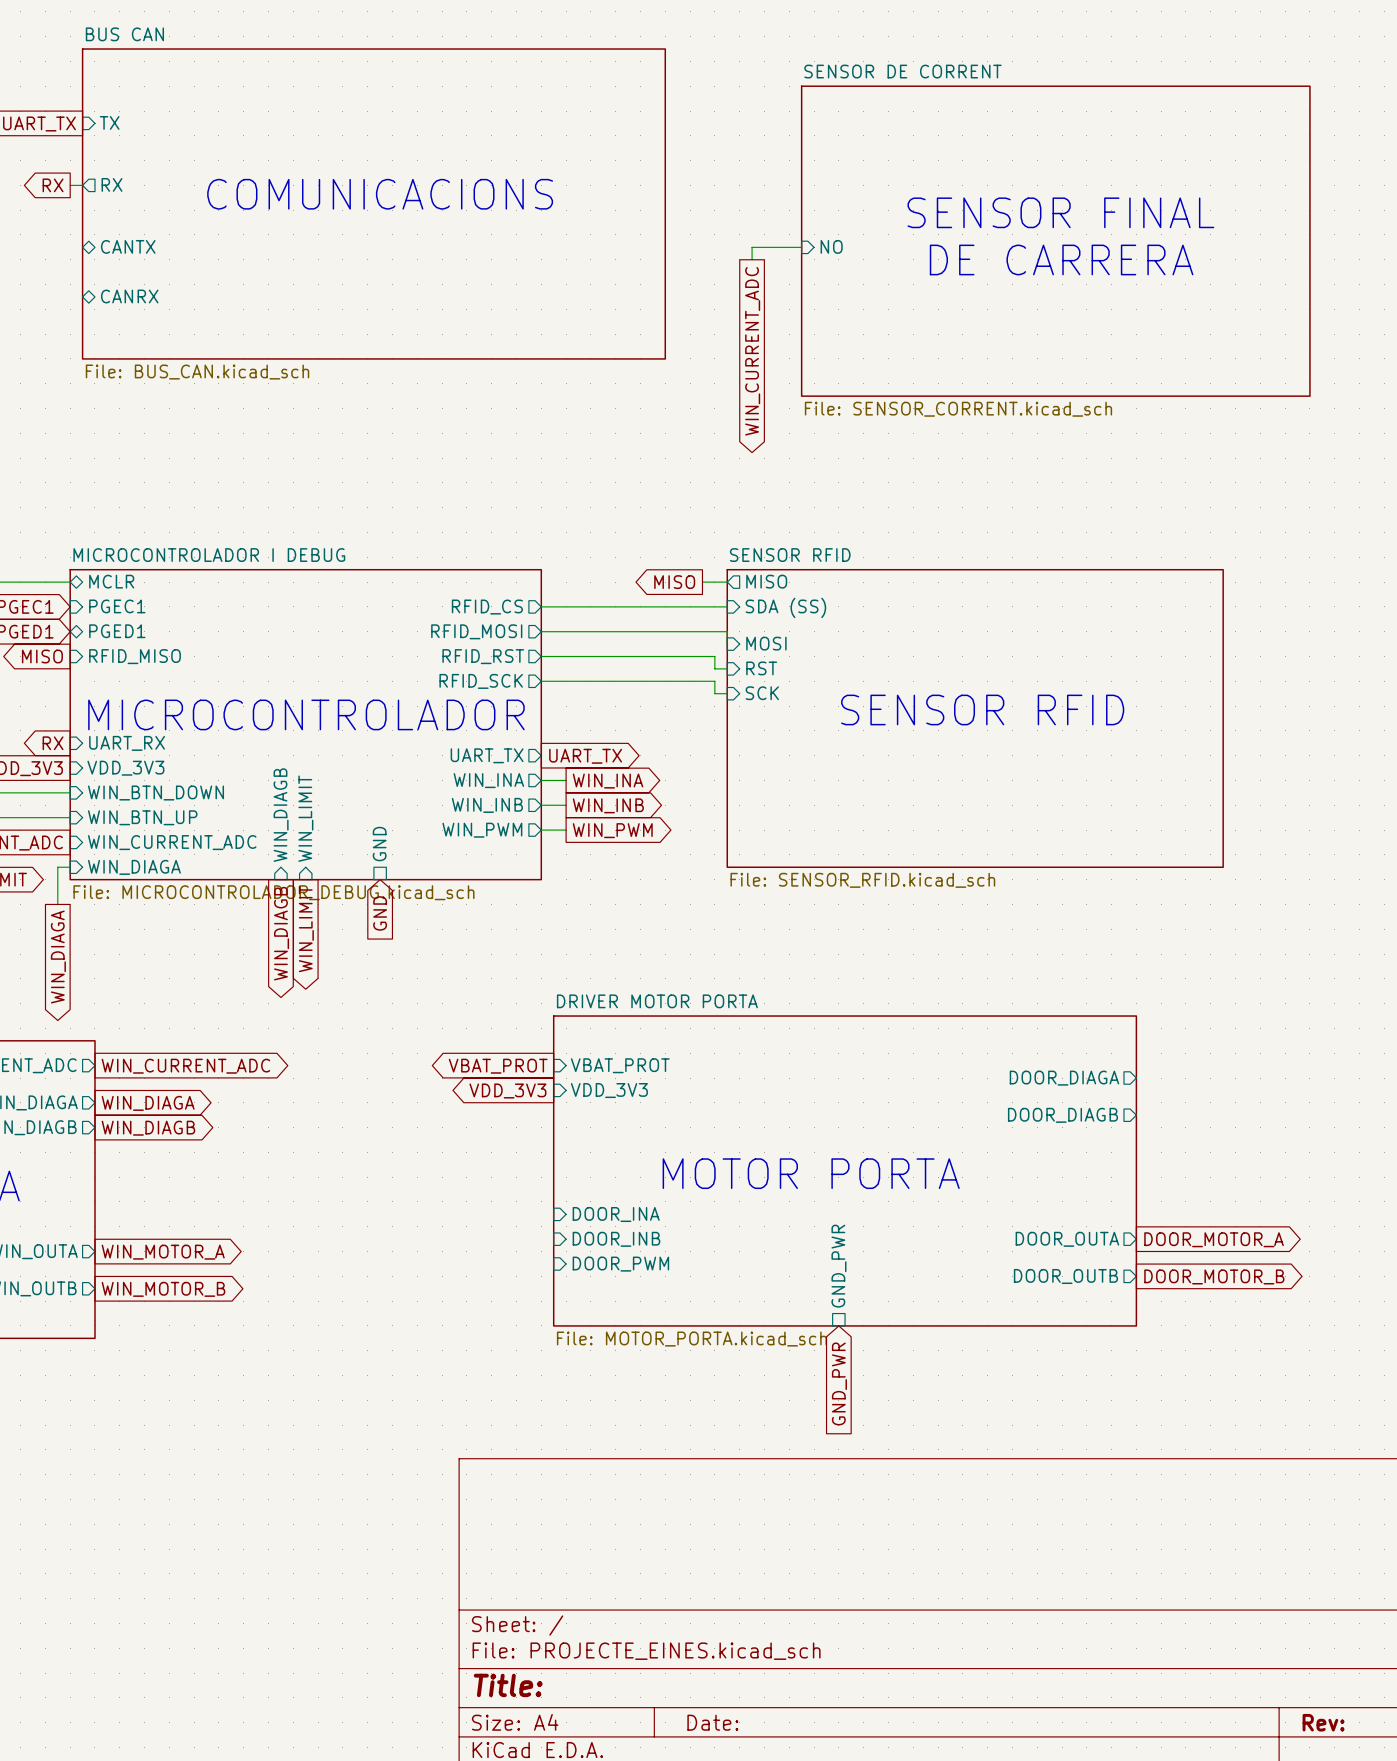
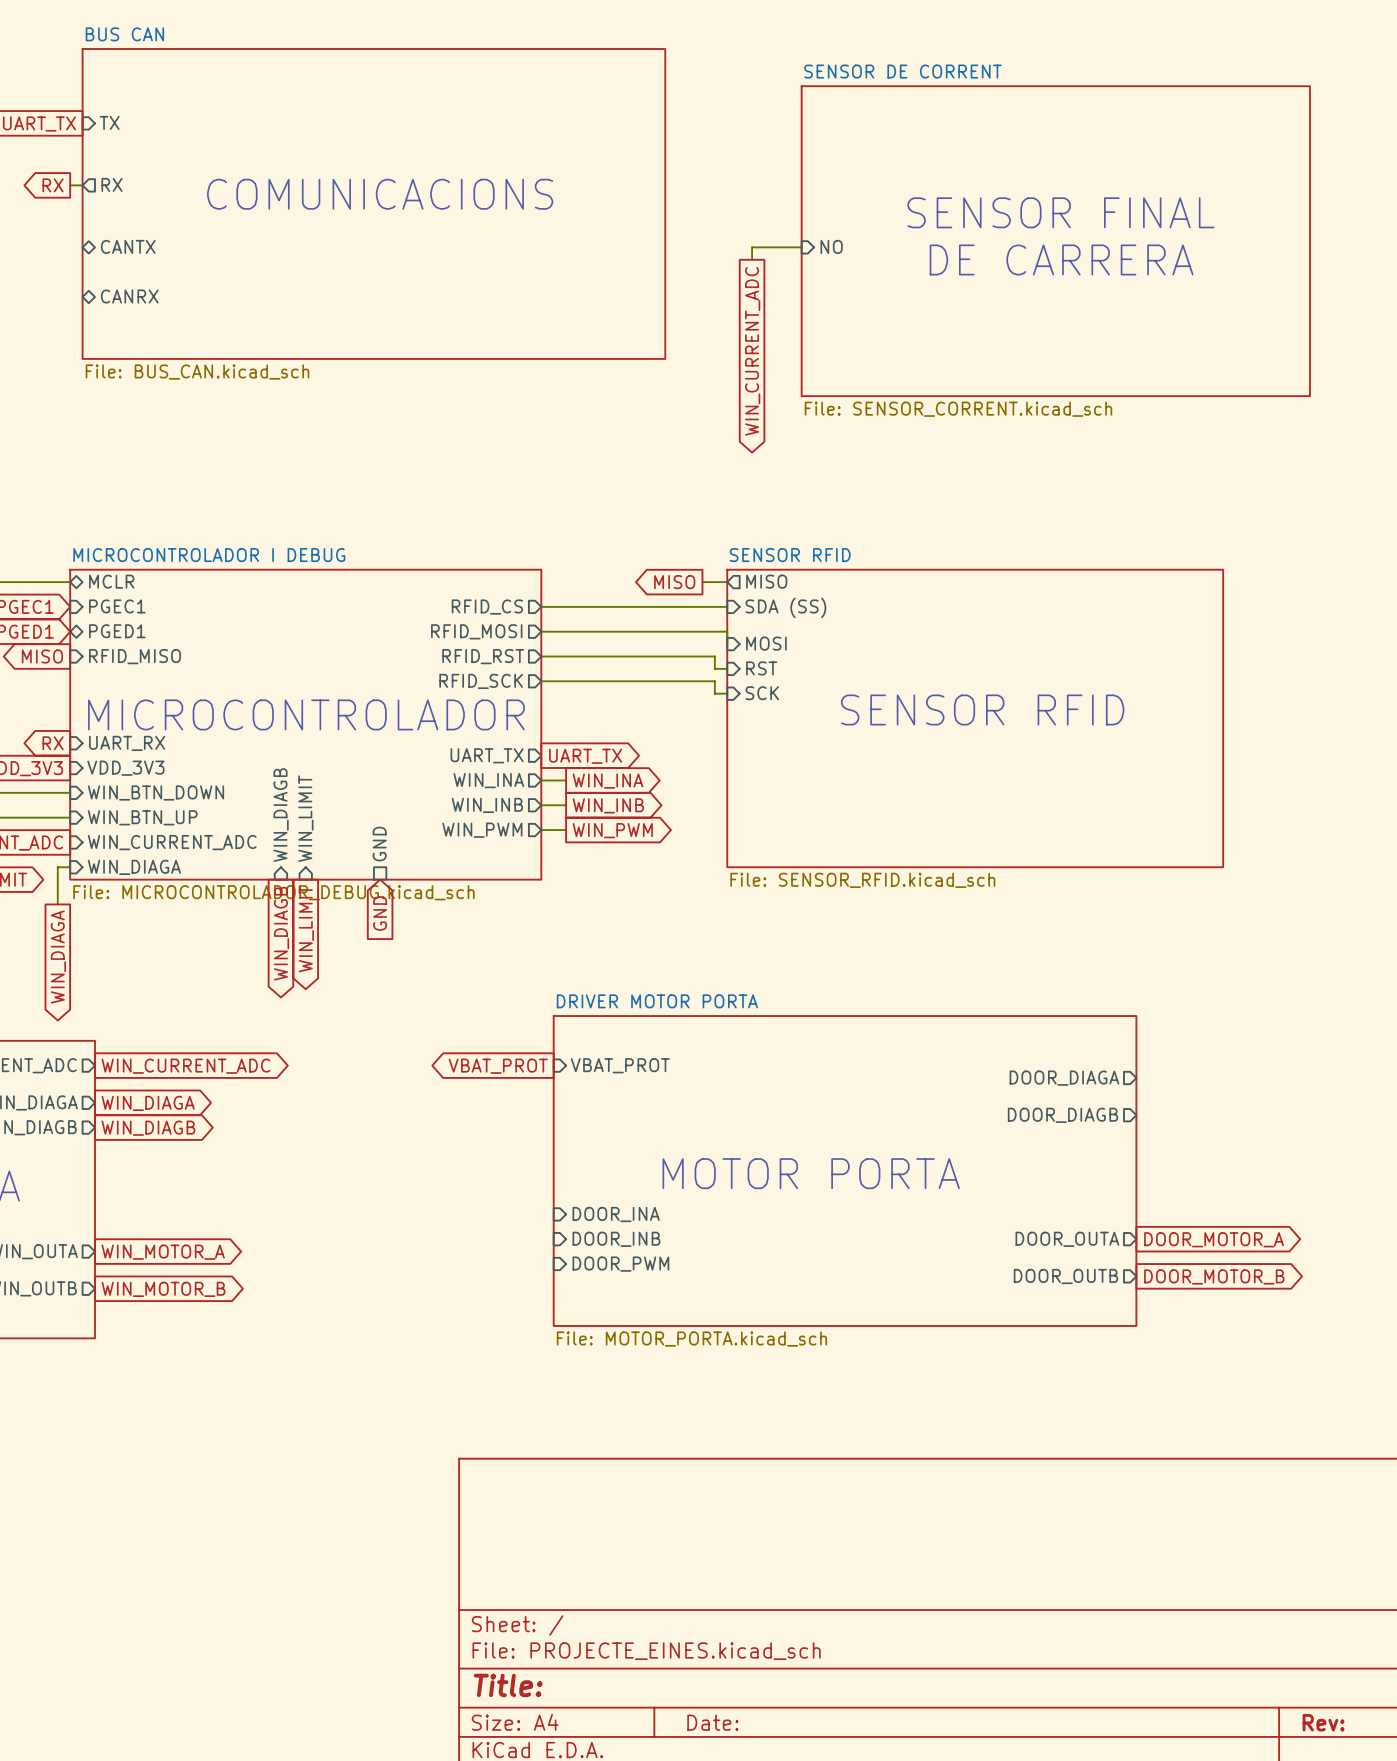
global label: VDD_3V3 (507, 1090) -> none
sheet pin: VDD_3V3 (609, 1090) -> none
sheet pin: GND_PWR (838, 1266) -> none
global label: GND_PWR (839, 1383) -> none

